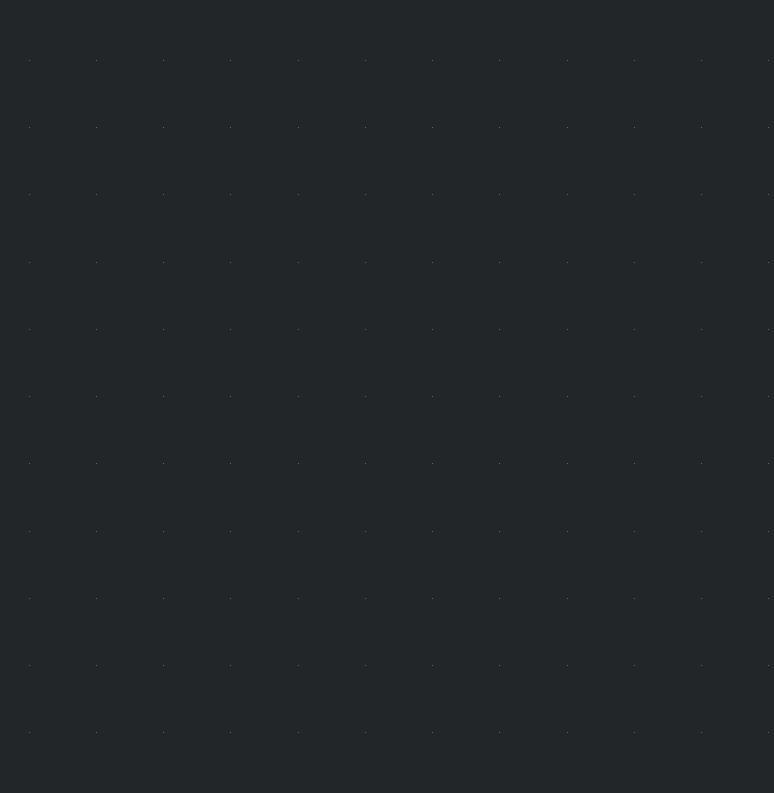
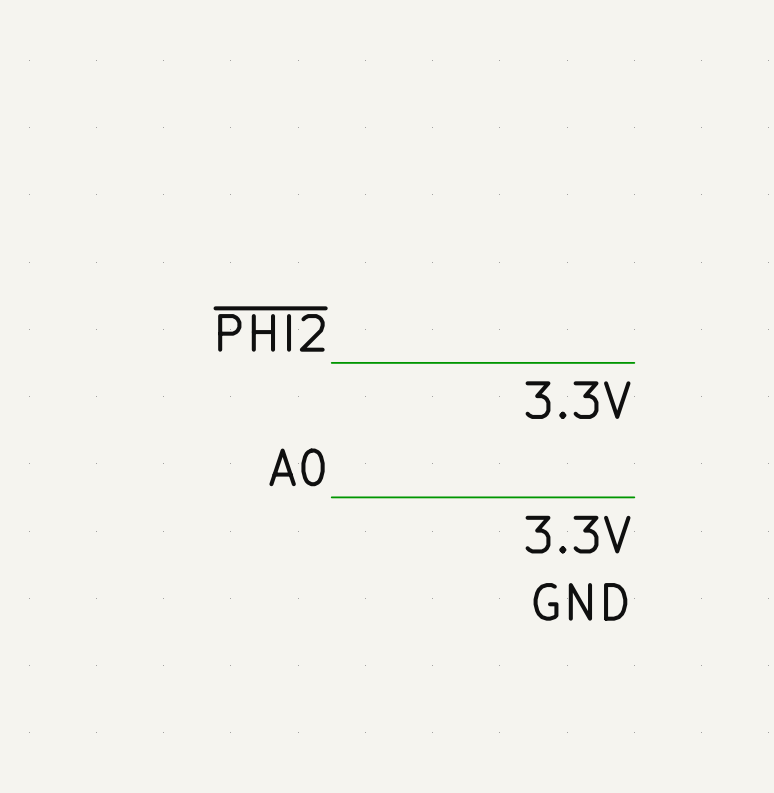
label: none -> ~{PHI2} (270, 329)
wire: none -> (331, 362) (634, 362)
label: none -> 3.3V (578, 400)
label: none -> A0 (297, 467)
wire: none -> (331, 497) (634, 497)
label: none -> 3.3V (578, 534)
label: none -> GND (580, 601)

